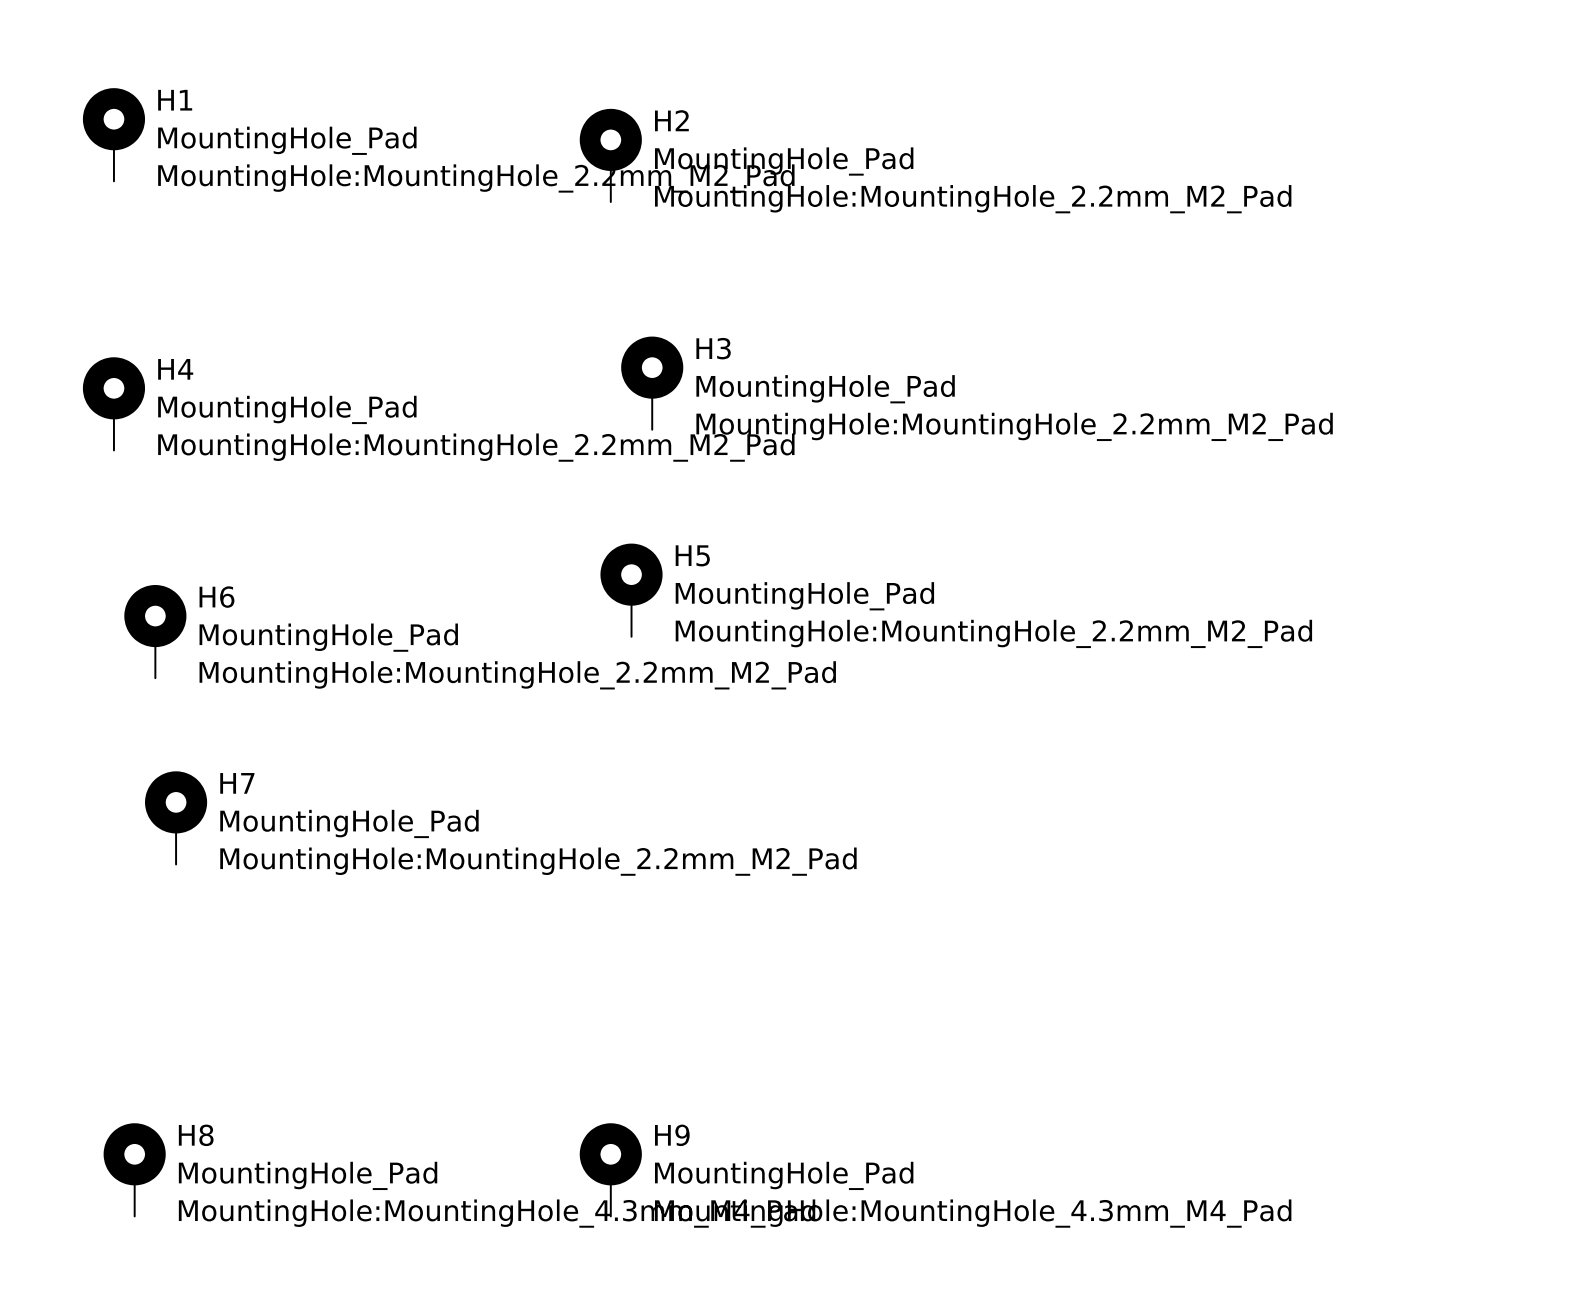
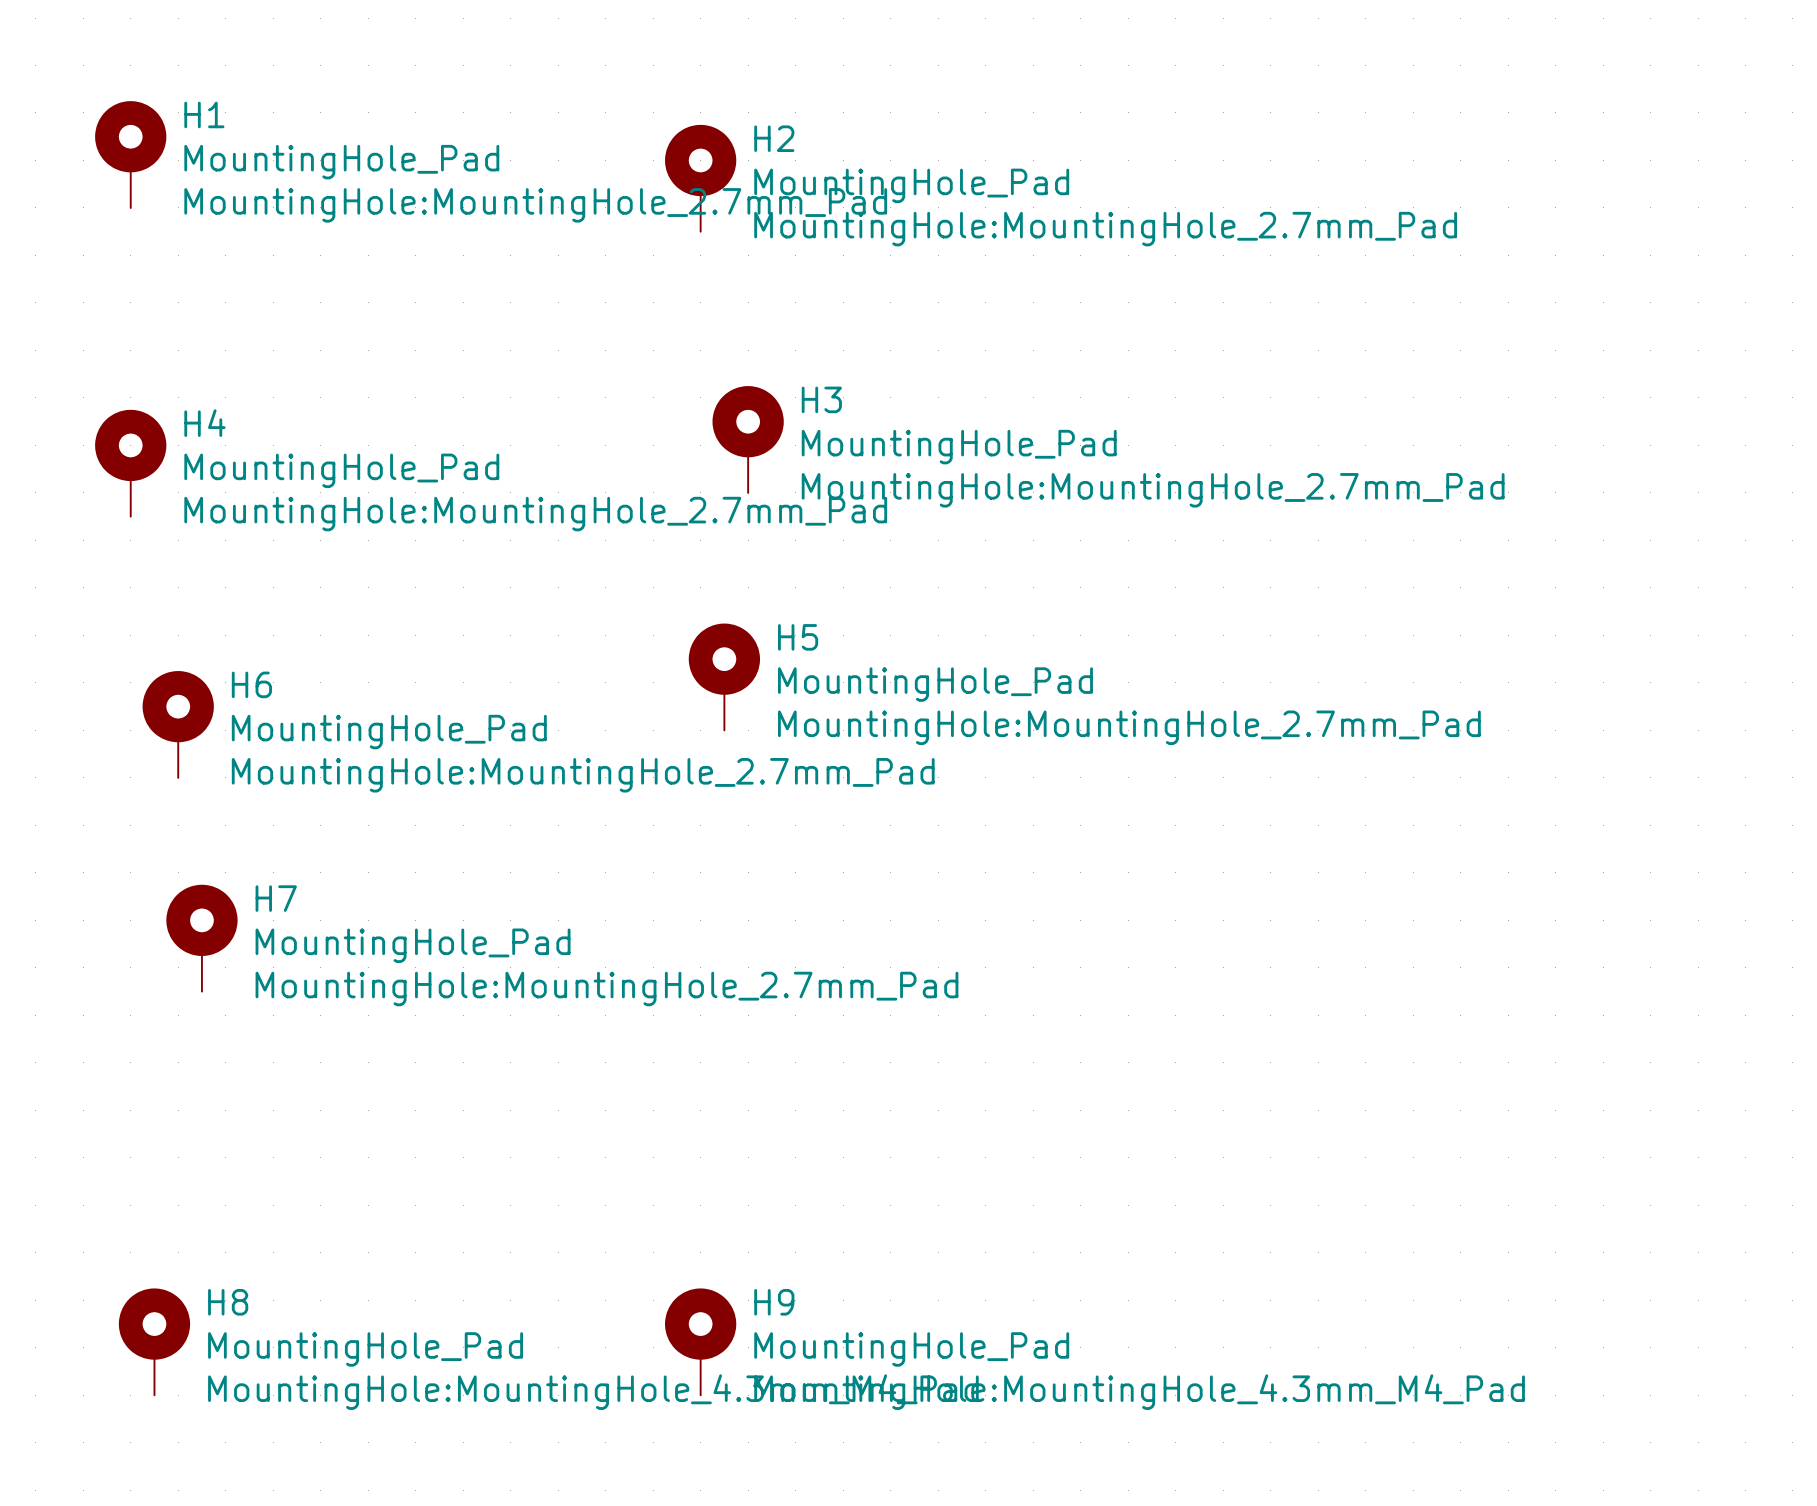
H1 text: MountingHole:MountingHole_2.2mm_M2_Pad (476, 178) -> MountingHole:MountingHole_2.7mm_Pad (535, 205)
H2 text: MountingHole:MountingHole_2.2mm_M2_Pad (973, 199) -> MountingHole:MountingHole_2.7mm_Pad (1105, 229)
H3 text: MountingHole:MountingHole_2.2mm_M2_Pad (1014, 426) -> MountingHole:MountingHole_2.7mm_Pad (1153, 490)
H4 text: MountingHole:MountingHole_2.2mm_M2_Pad (476, 447) -> MountingHole:MountingHole_2.7mm_Pad (535, 514)
H5 text: MountingHole:MountingHole_2.2mm_M2_Pad (993, 633) -> MountingHole:MountingHole_2.7mm_Pad (1129, 727)
H6 text: MountingHole:MountingHole_2.2mm_M2_Pad (517, 675) -> MountingHole:MountingHole_2.7mm_Pad (583, 775)
H7 text: MountingHole:MountingHole_2.2mm_M2_Pad (538, 861) -> MountingHole:MountingHole_2.7mm_Pad (606, 988)

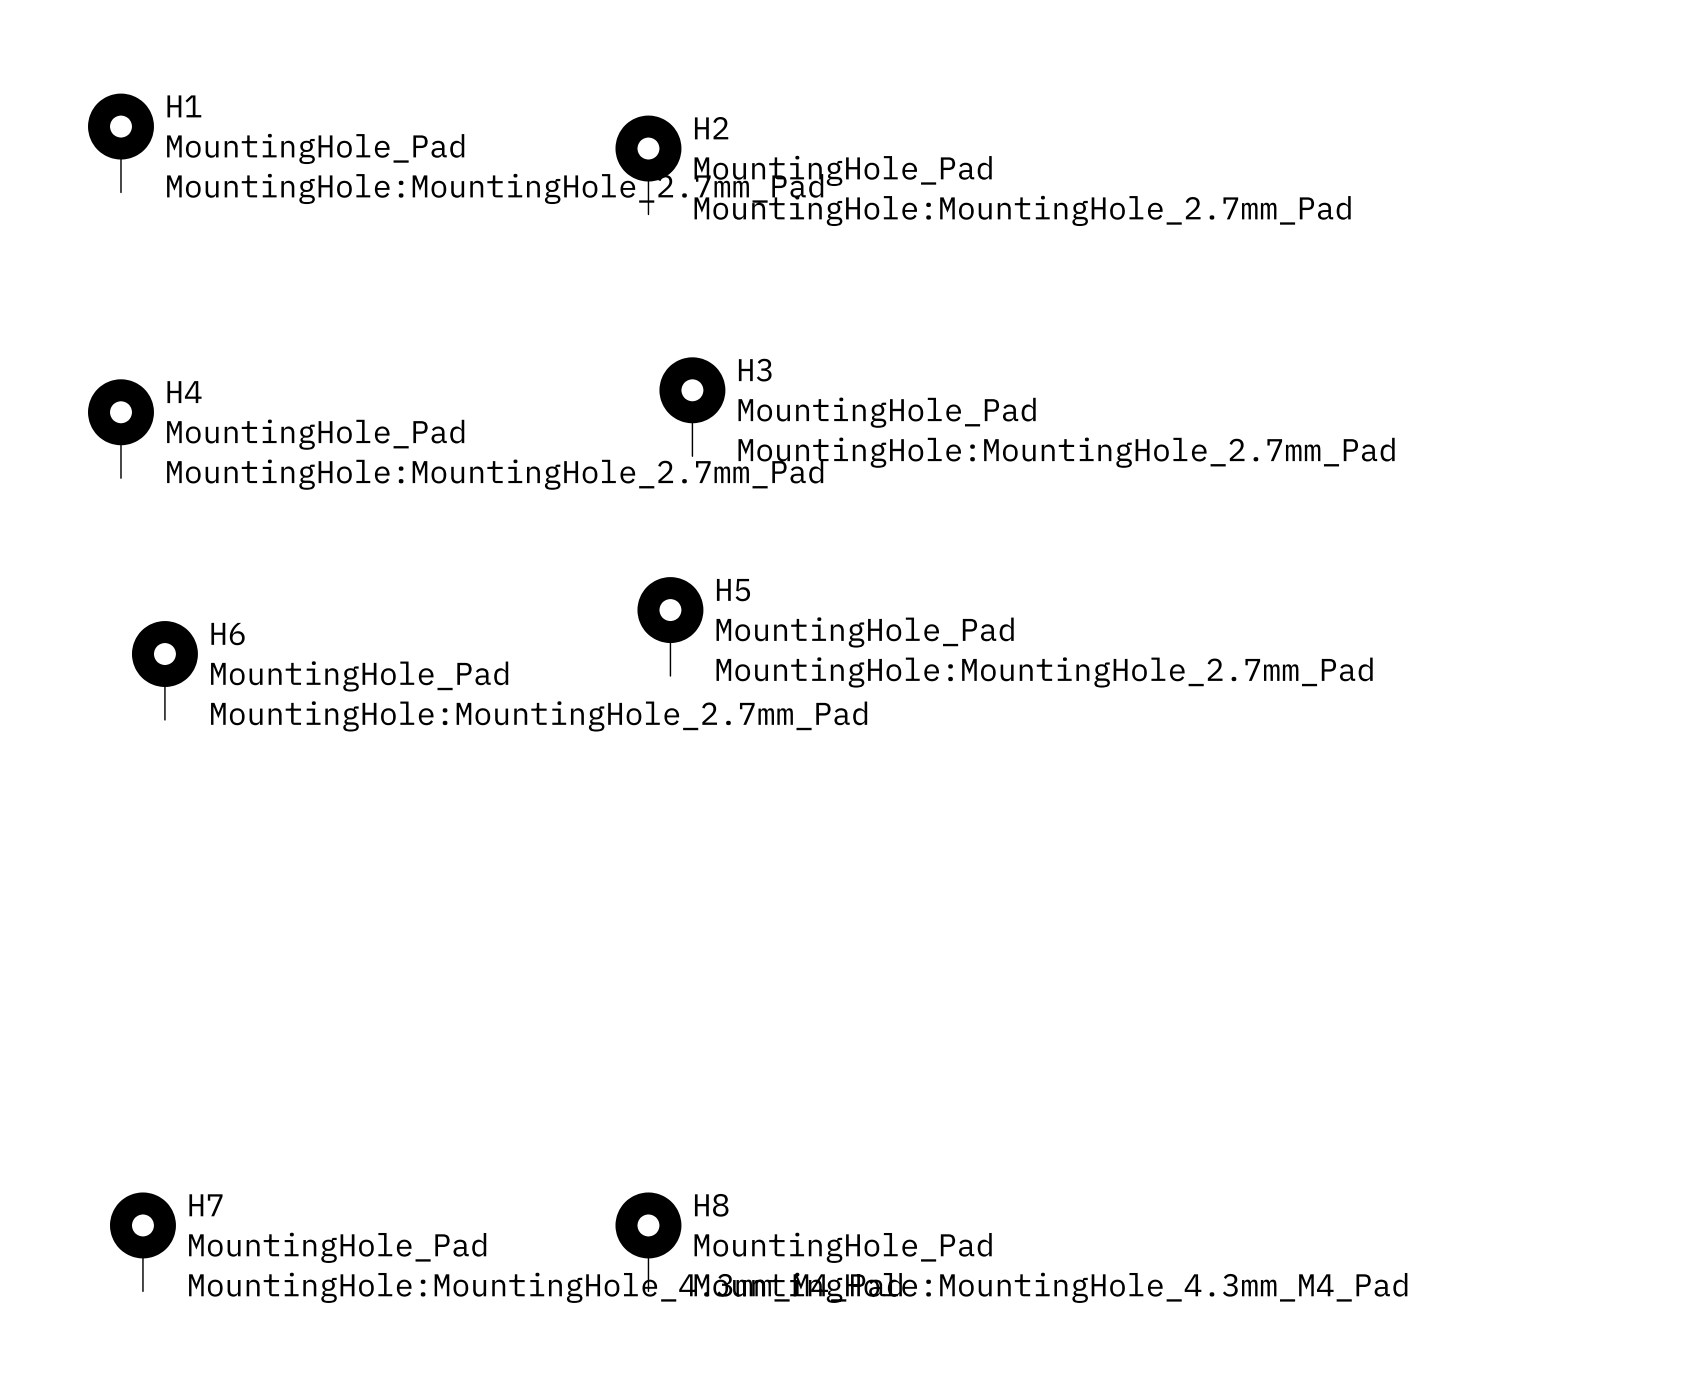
H7: MountingHole_Pad (201, 938) -> none
H8 name: H8 (228, 1302) -> H7 (205, 1205)
H9 name: H9 (774, 1302) -> H8 (711, 1205)

